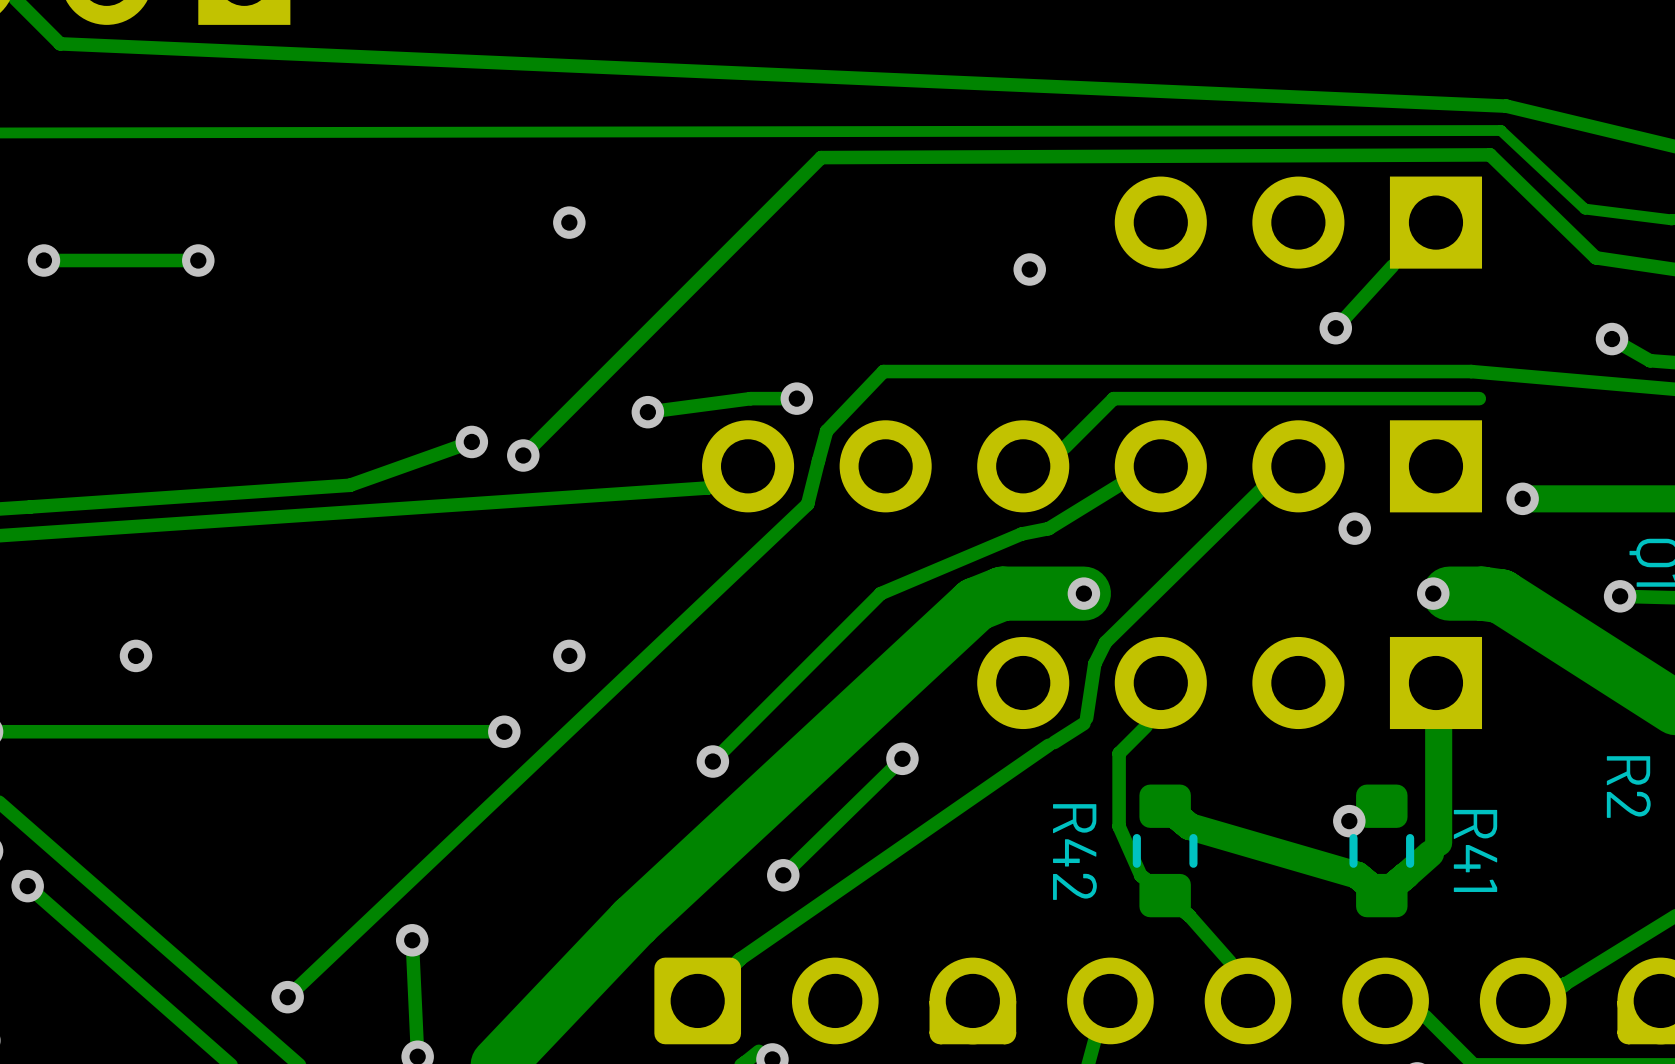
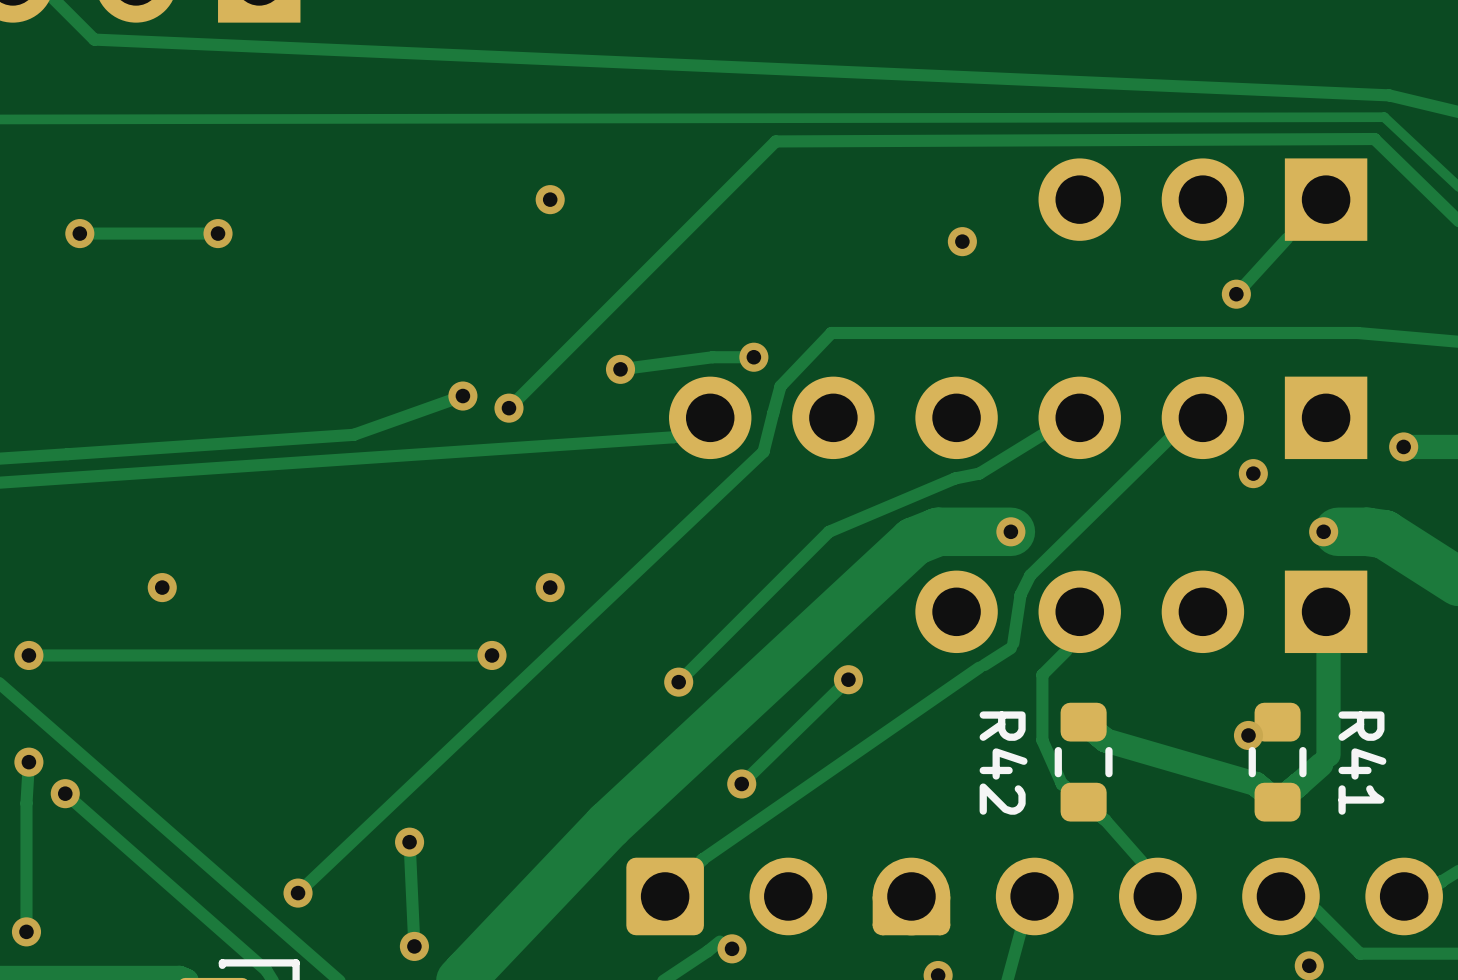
track: (1479, 398) (1113, 398) (1064, 447) -> none

